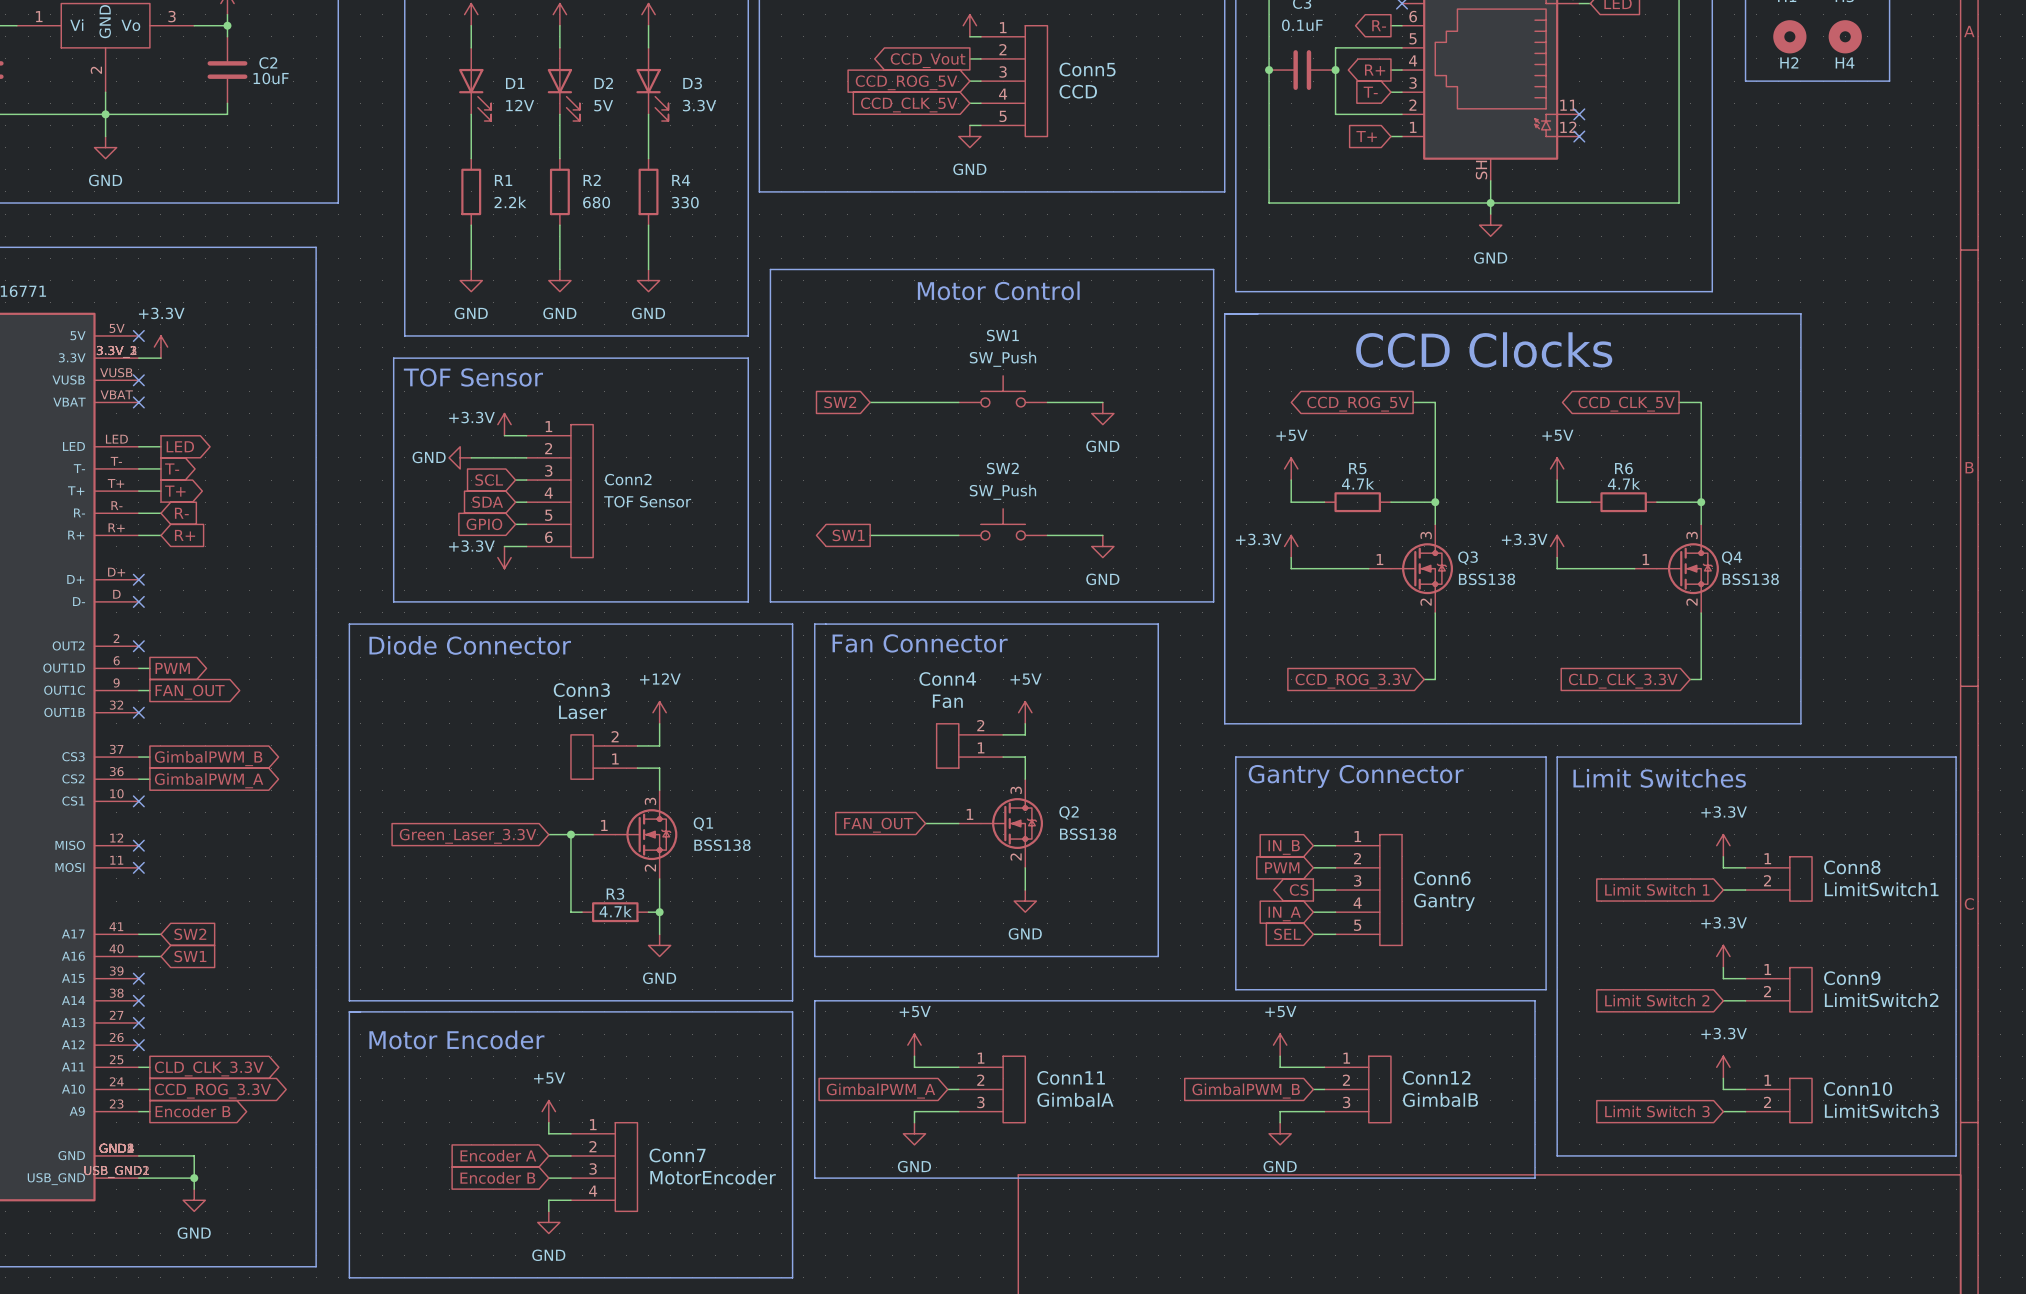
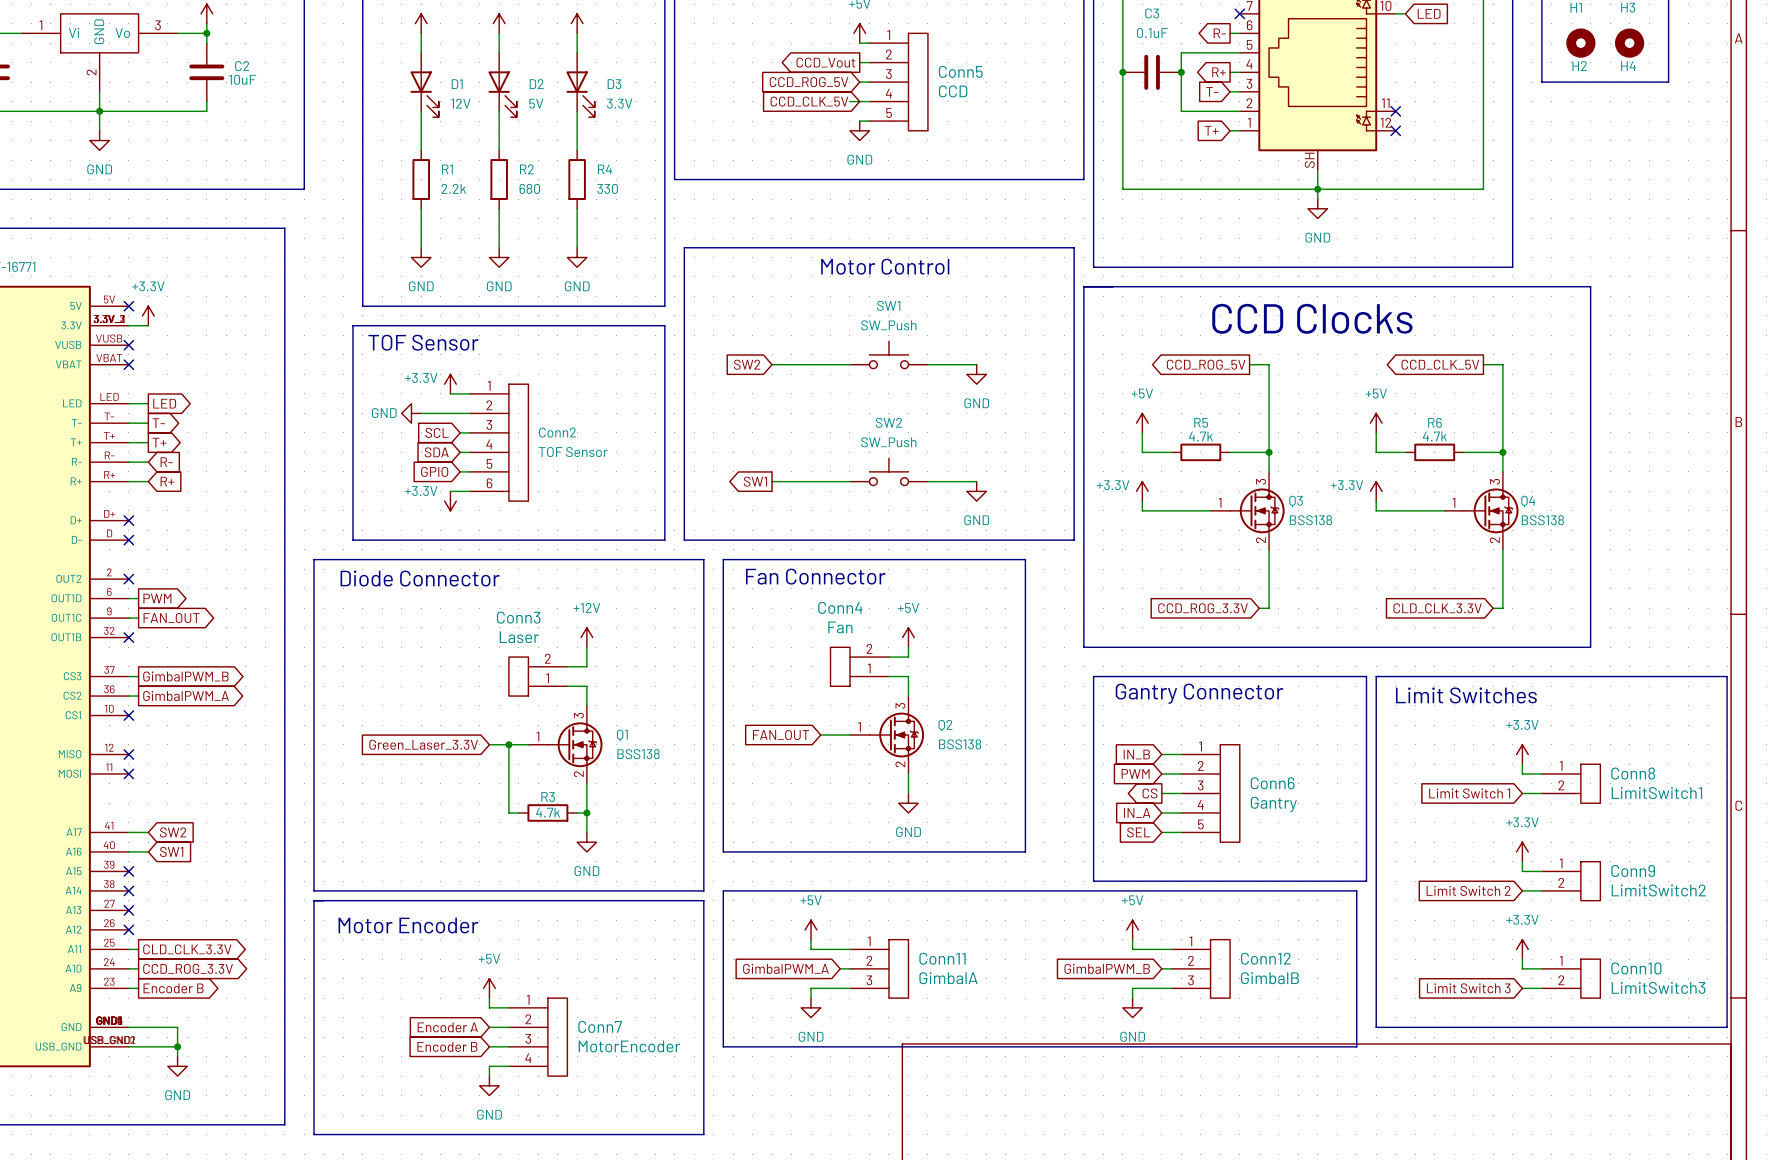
wire: none -> (849, 101) (859, 101)

